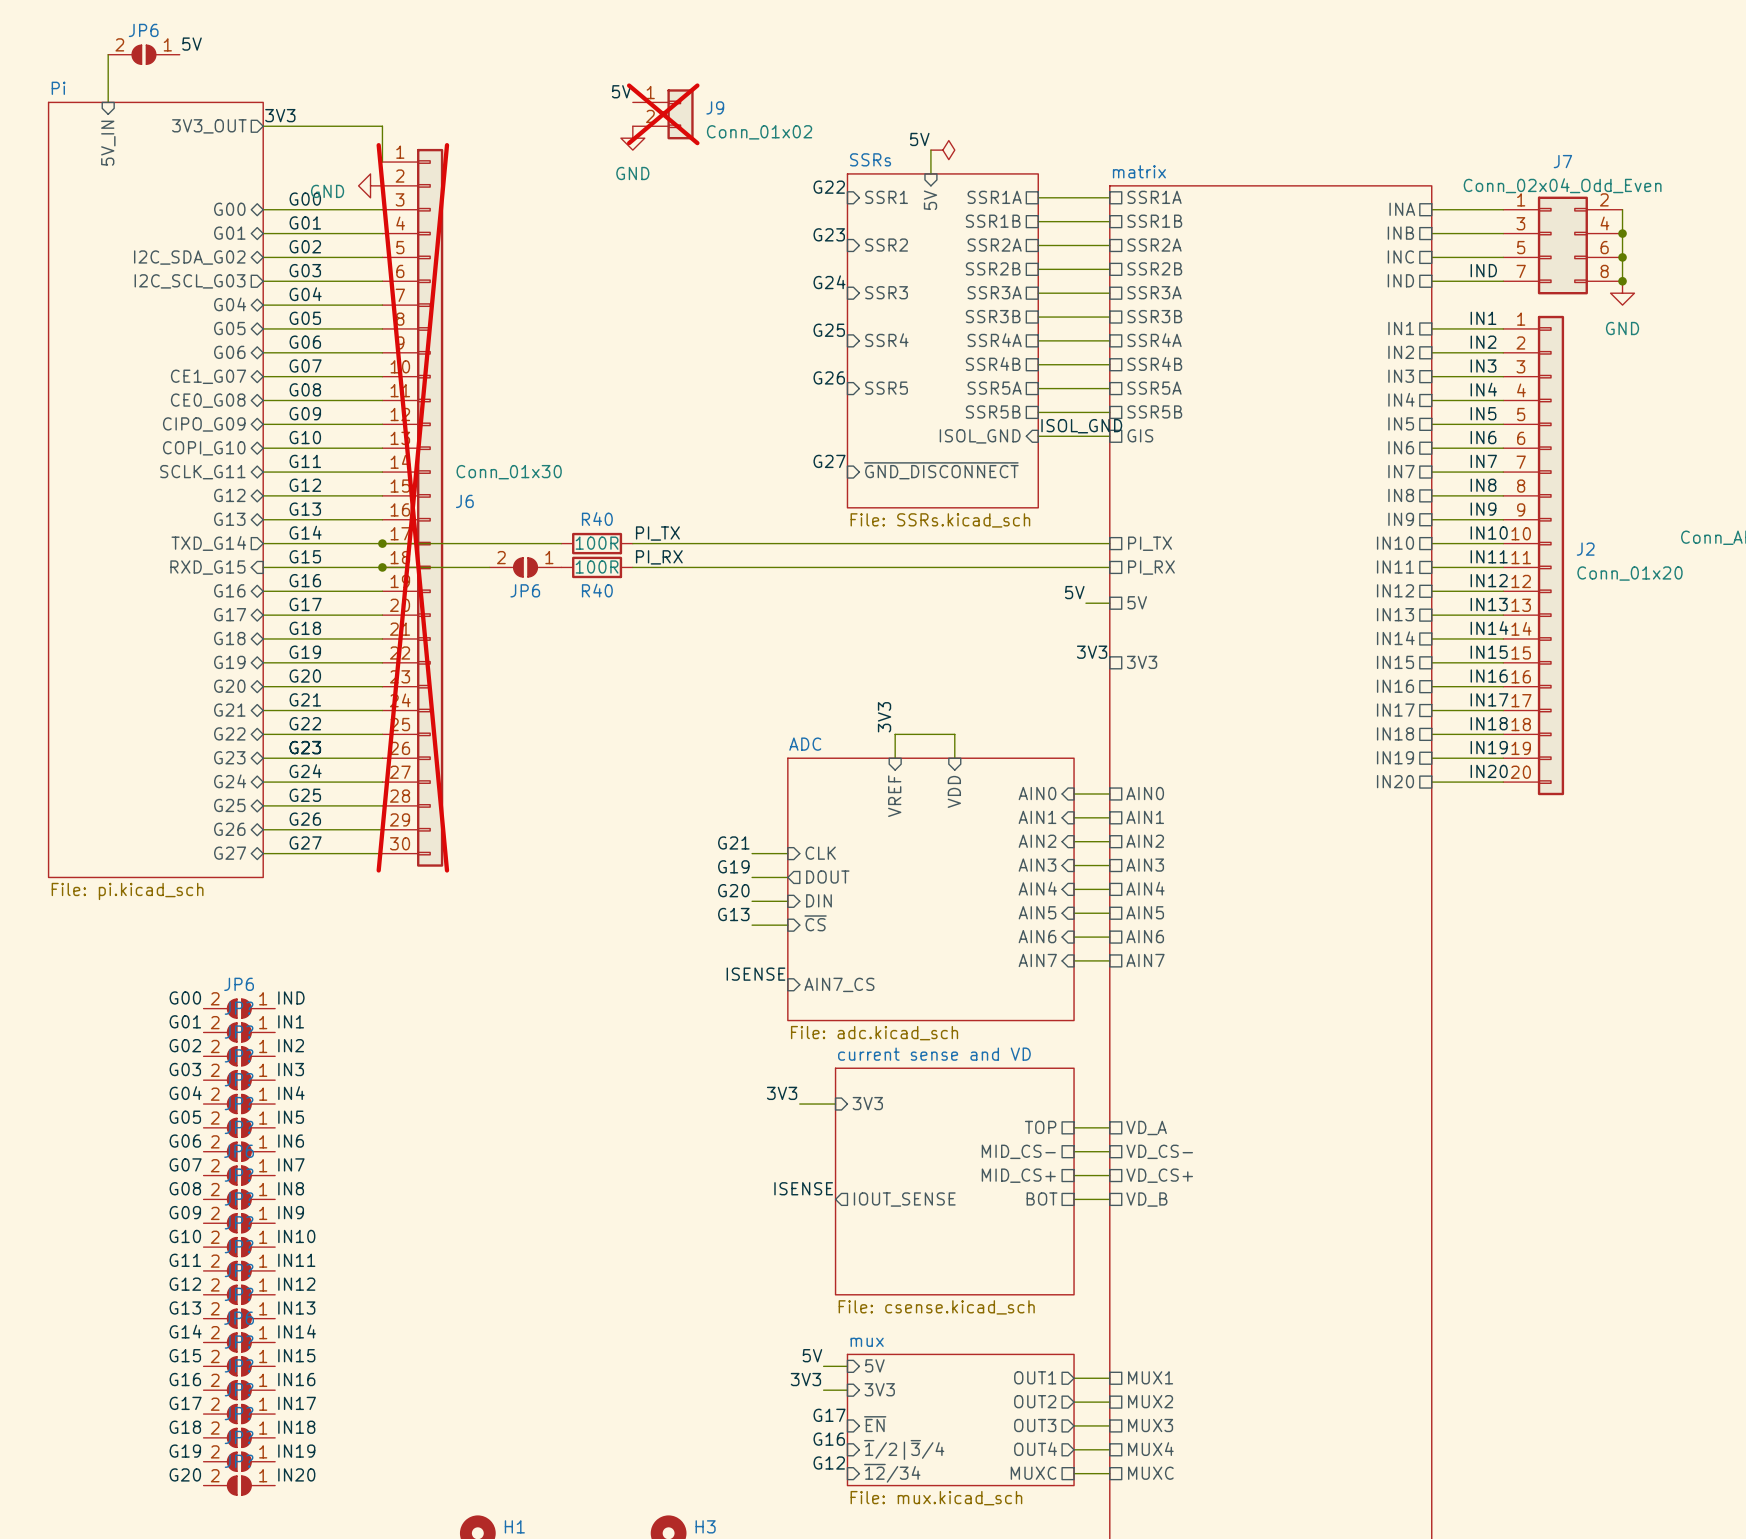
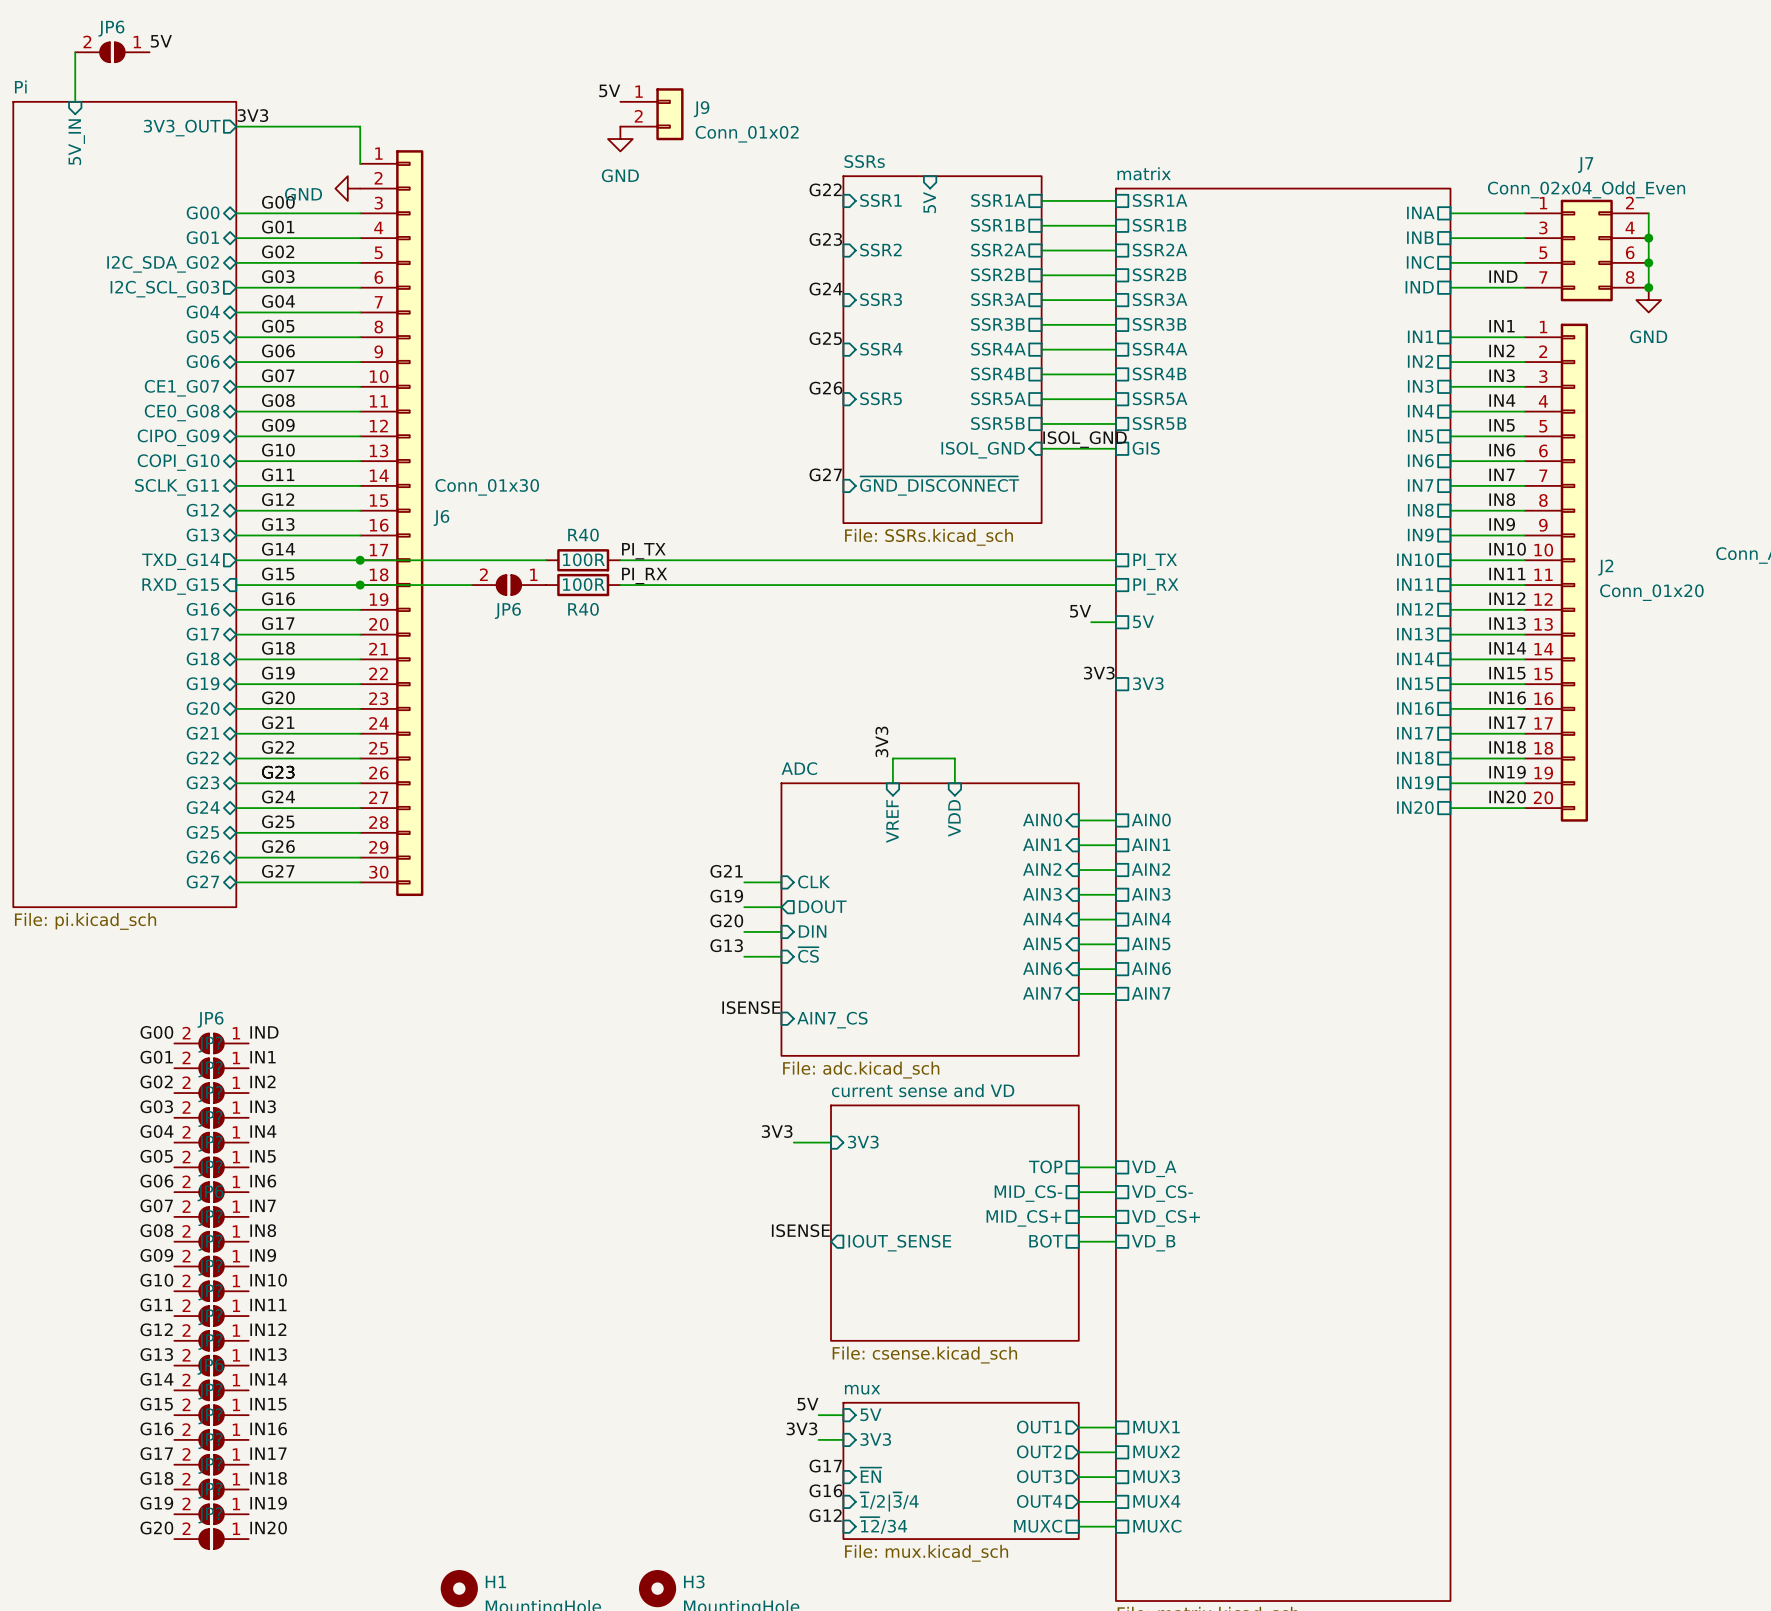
J9 do-not-place cross: (663, 114) -> none
label: 5V (919, 139) -> none
wire: (930, 150) (930, 173) -> none
power symbol: (942, 150) -> none
J6 do-not-place cross: (412, 507) -> none

